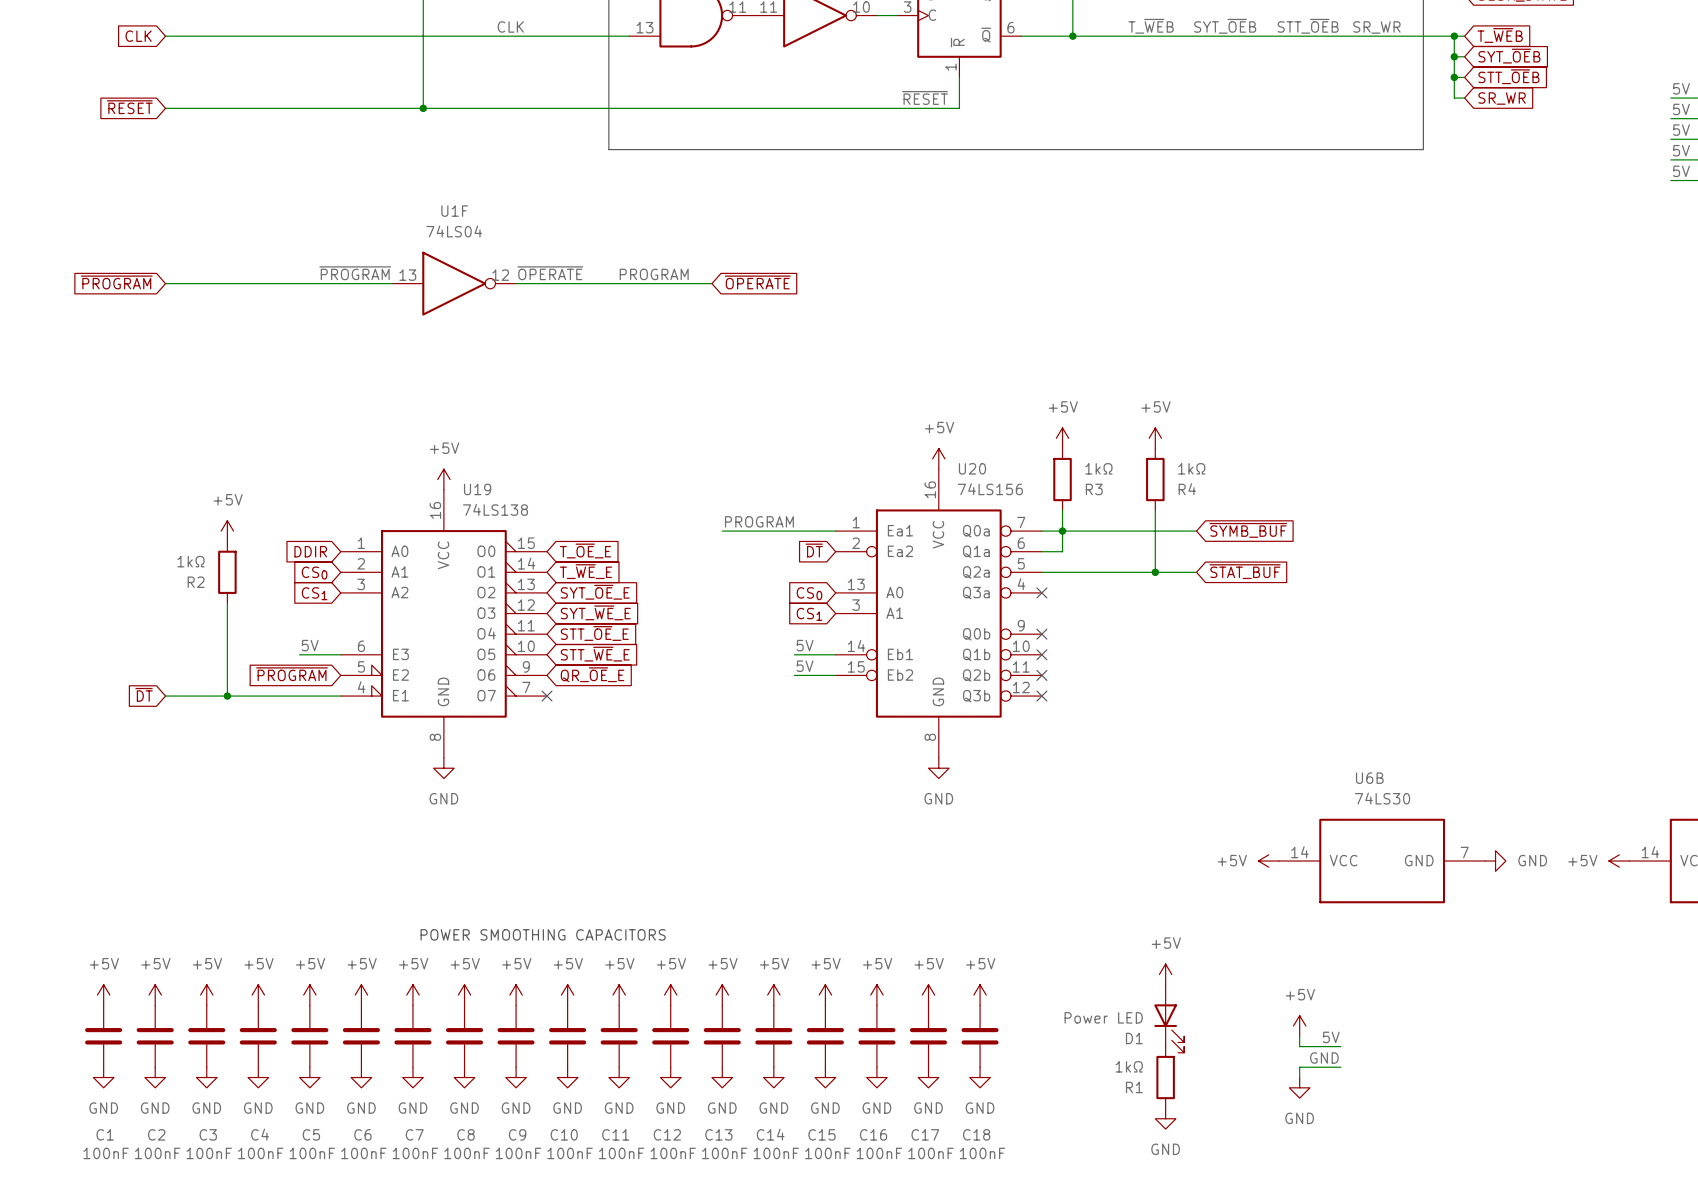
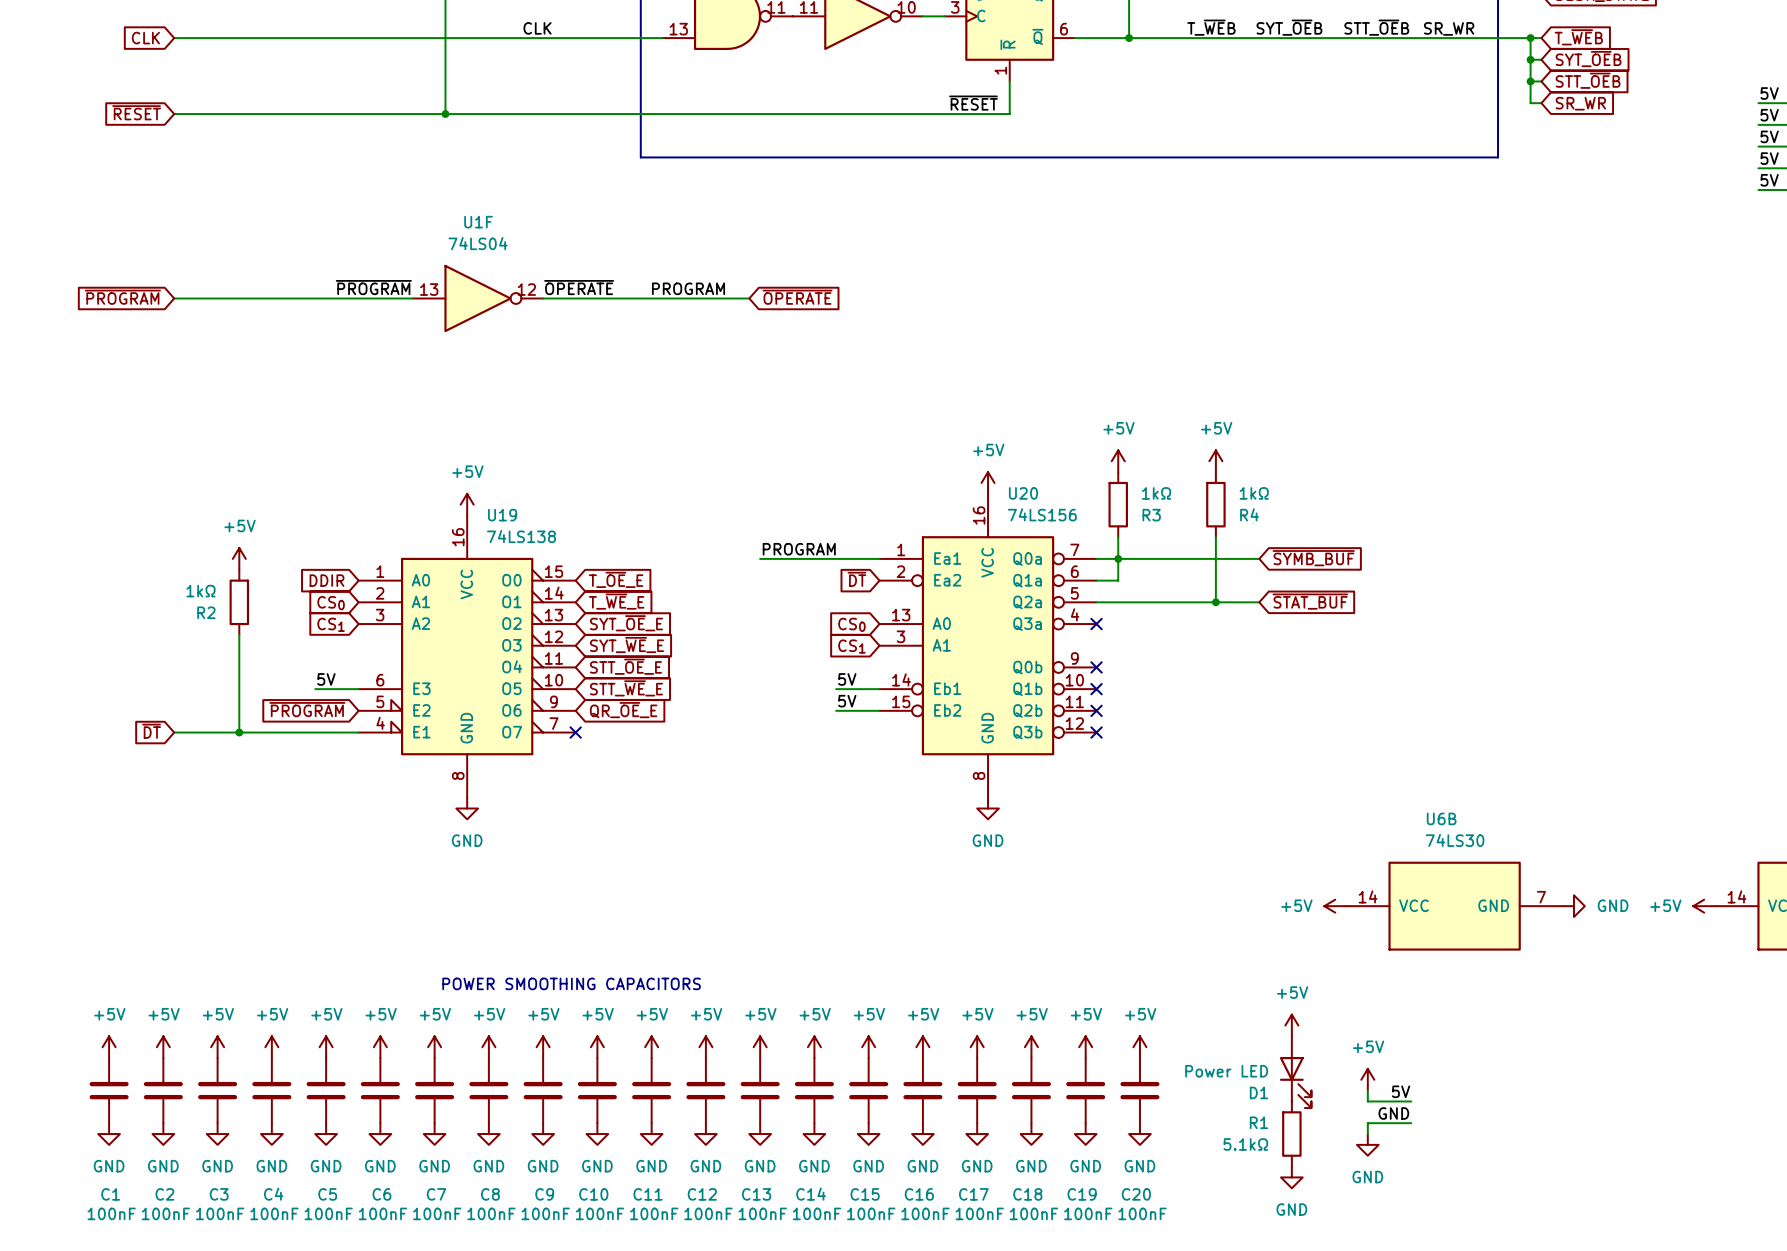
power symbol: +5V (1165, 974) -> none
power symbol: none -> +5V (1291, 1025)
power symbol: none -> +5V (1085, 1047)
power symbol: none -> +5V (1139, 1047)
D1 position: (1169, 1018) -> (1295, 1072)
C19: none -> 100nF (1085, 1090)
C20: none -> 100nF (1139, 1090)
R1 value: 1kΩ (1129, 1066) -> 5.1kΩ (1245, 1144)
power symbol: none -> GND (1085, 1134)
power symbol: none -> GND (1139, 1134)
R1 position: (1165, 1077) -> (1291, 1134)
R1 name position: R1 (1134, 1087) -> R1 (1258, 1122)
power symbol: GND (1165, 1118) -> none
power symbol: none -> GND (1291, 1177)

